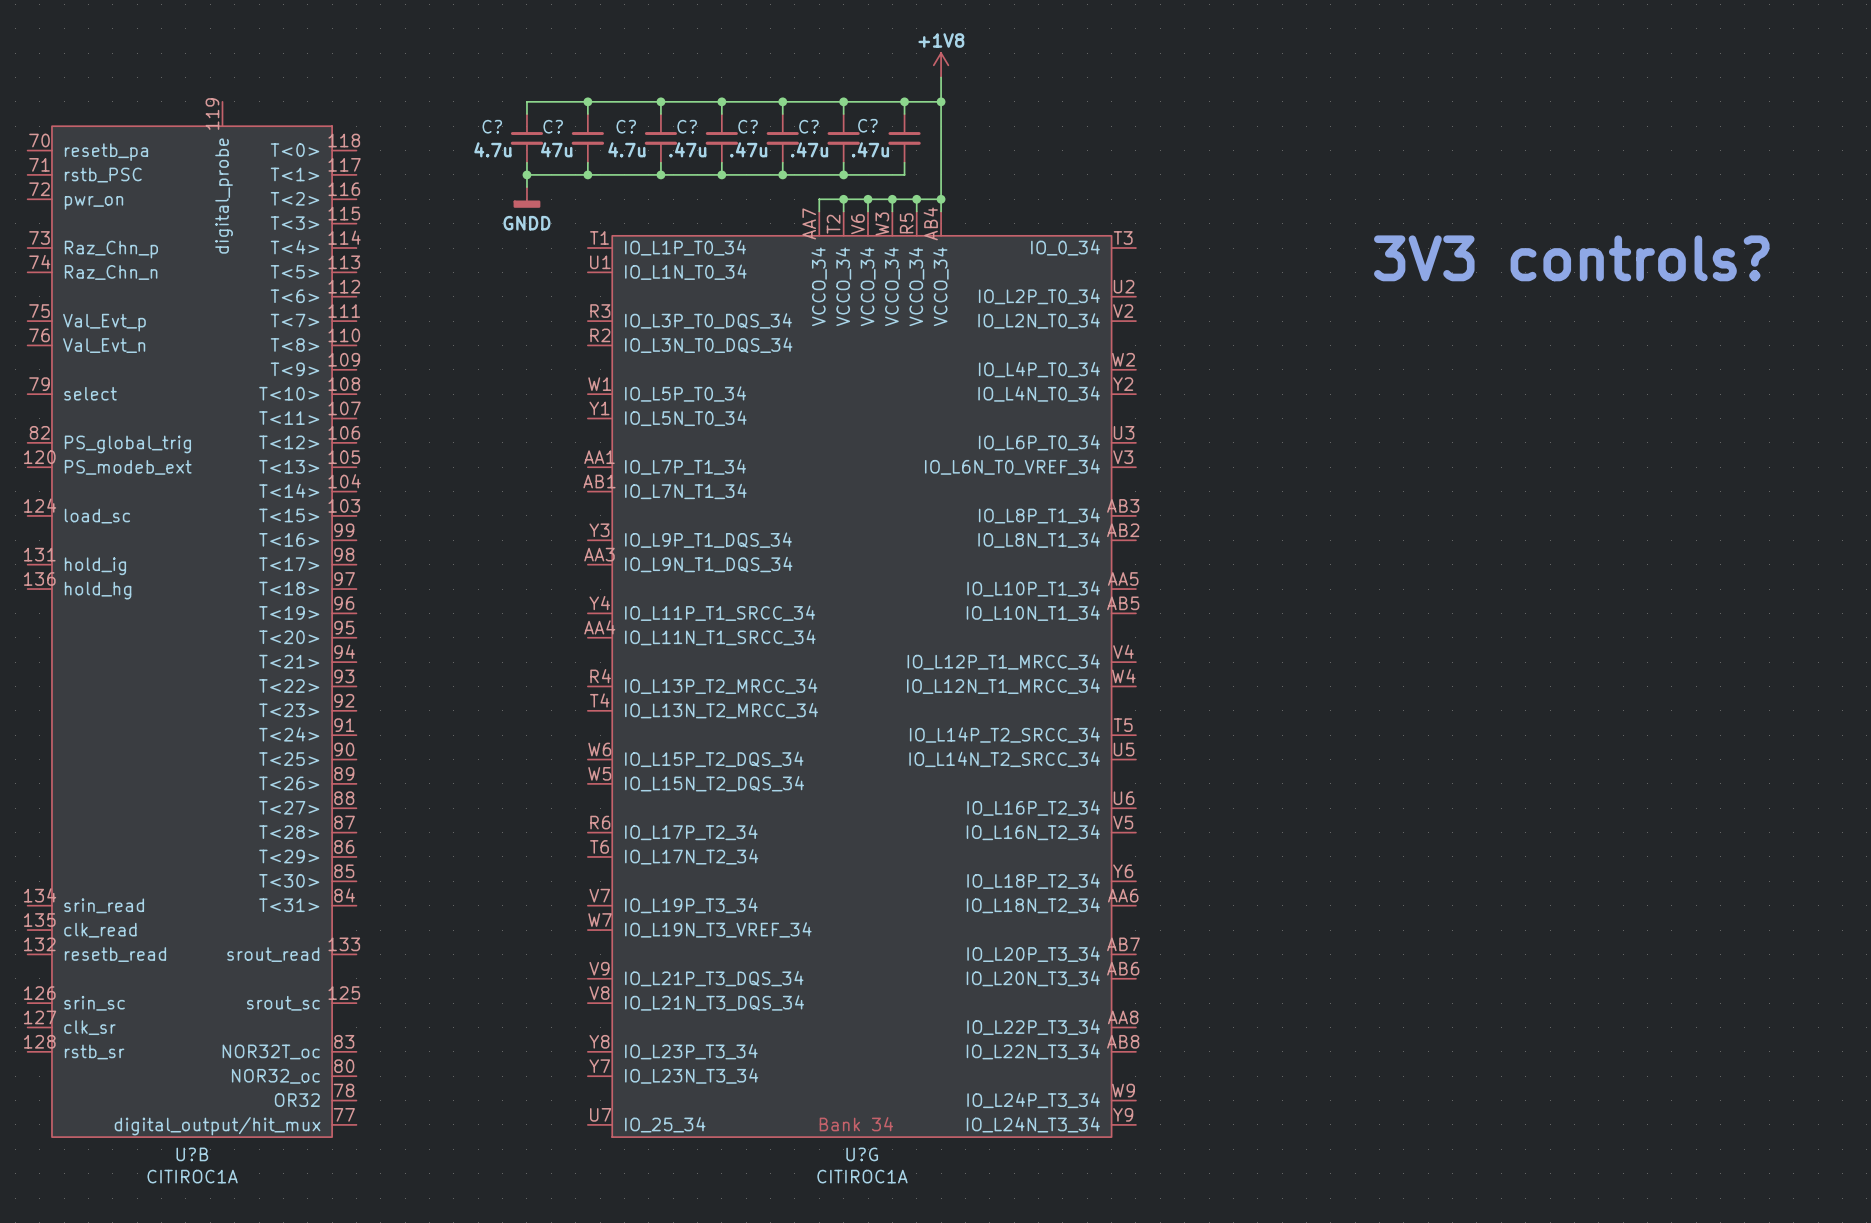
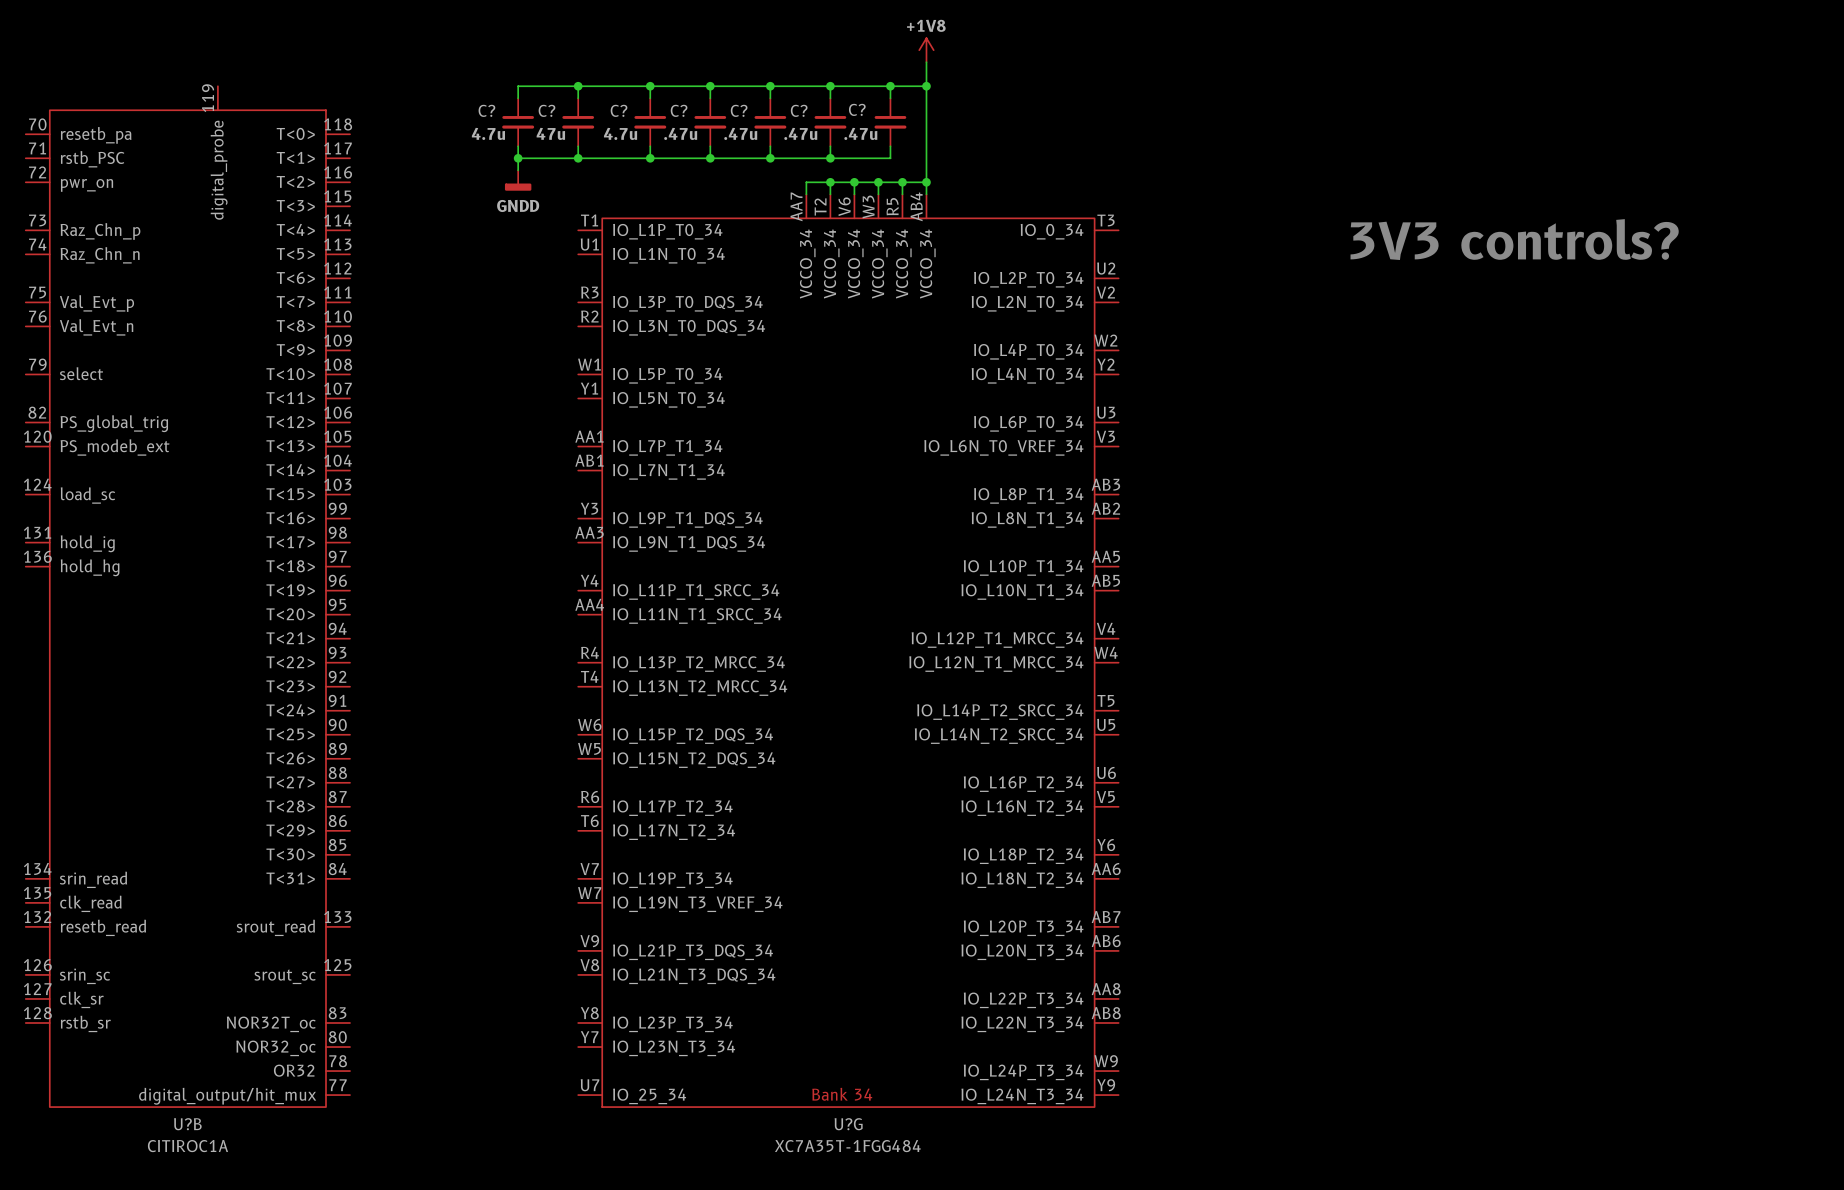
U?G value: CITIROC1A (862, 1176) -> XC7A35T-1FGG484 (847, 1146)

